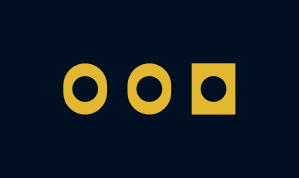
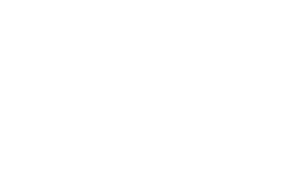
part: (149, 88) -> none

